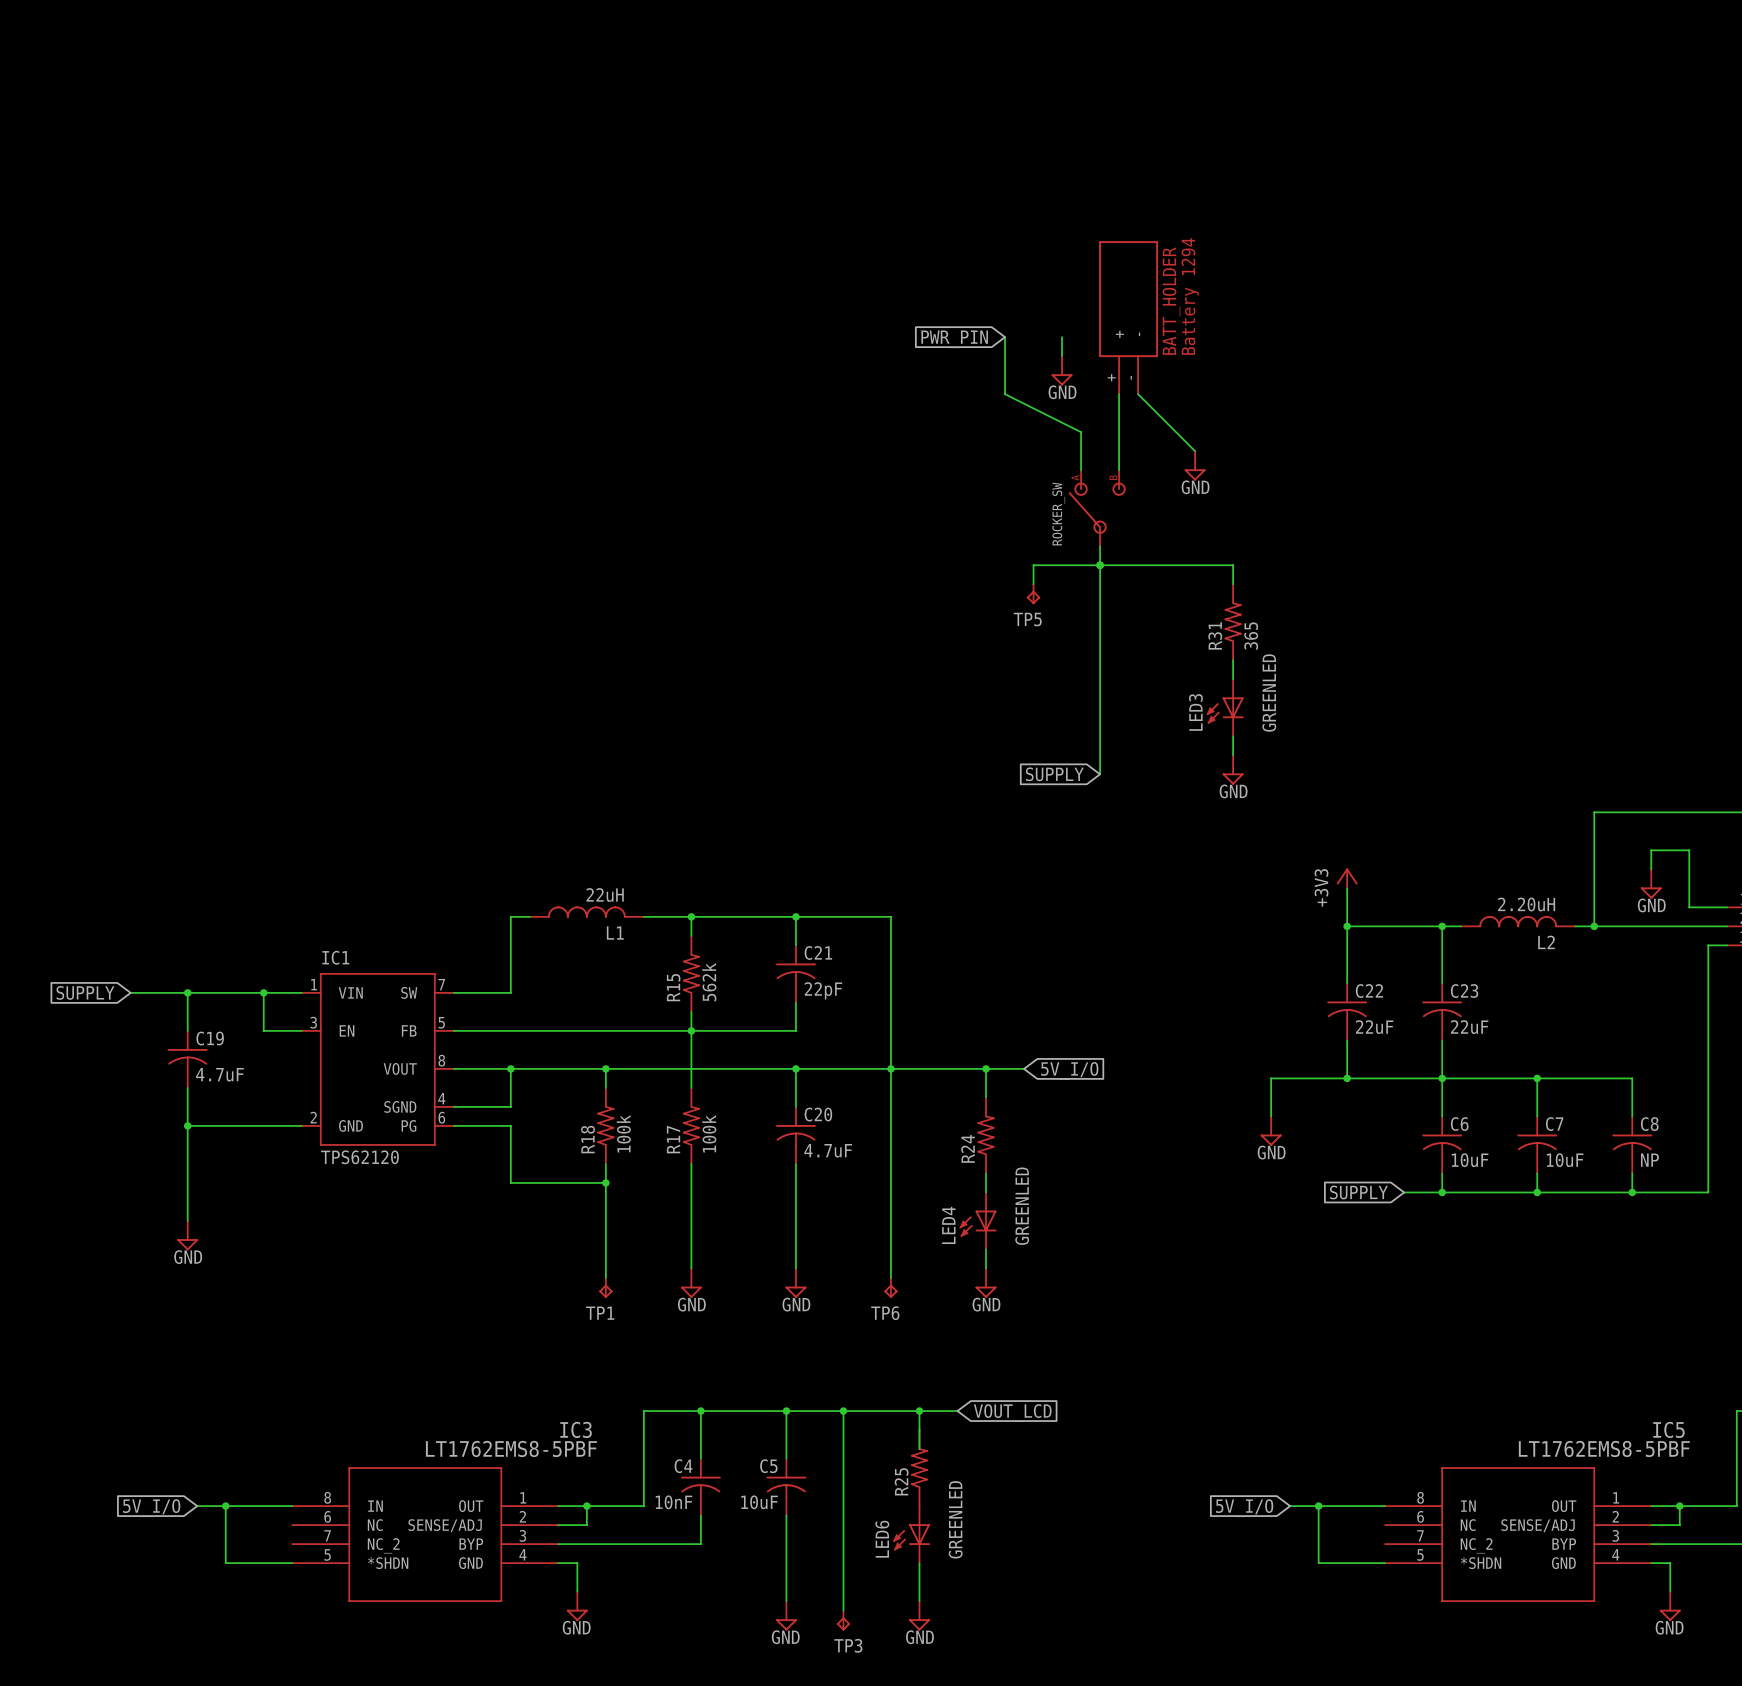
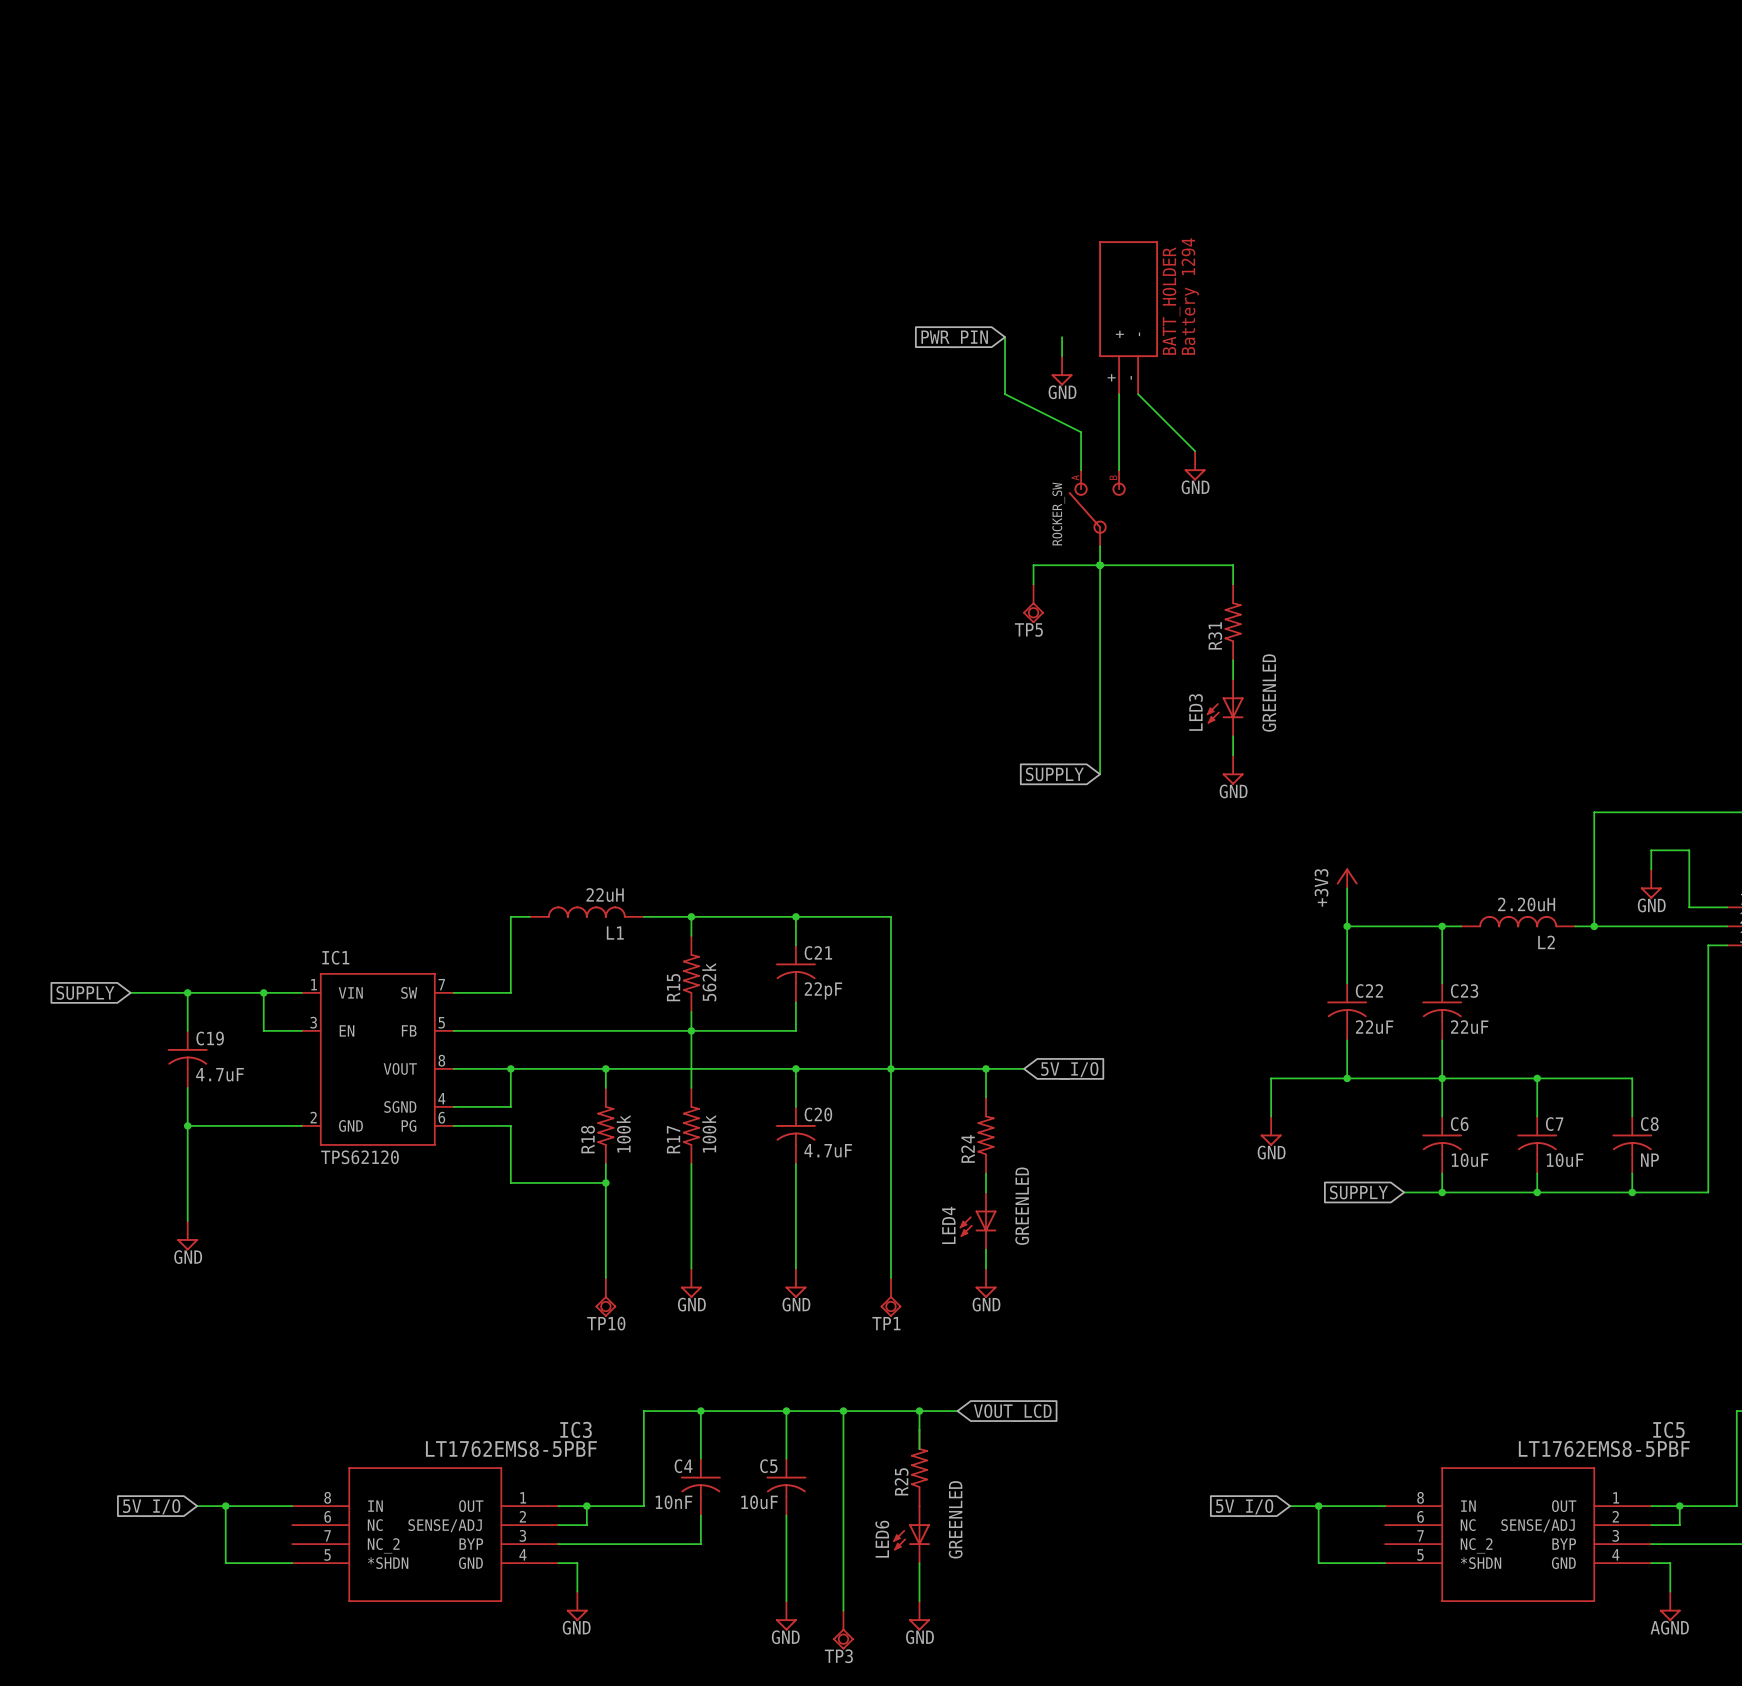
TP5 symbol: [1026, 584, 1041, 605] -> [1023, 584, 1044, 623]
R31 value: 365 (1251, 636) -> none
TP1 symbol: [599, 1278, 613, 1298] -> [880, 1278, 902, 1317]
TP6: (890, 1287) -> none
TP10: none -> (605, 1297)
power symbol: GND (1670, 1606) -> AGND (1670, 1606)
TP3 symbol: [836, 1610, 851, 1631] -> [833, 1610, 854, 1650]

